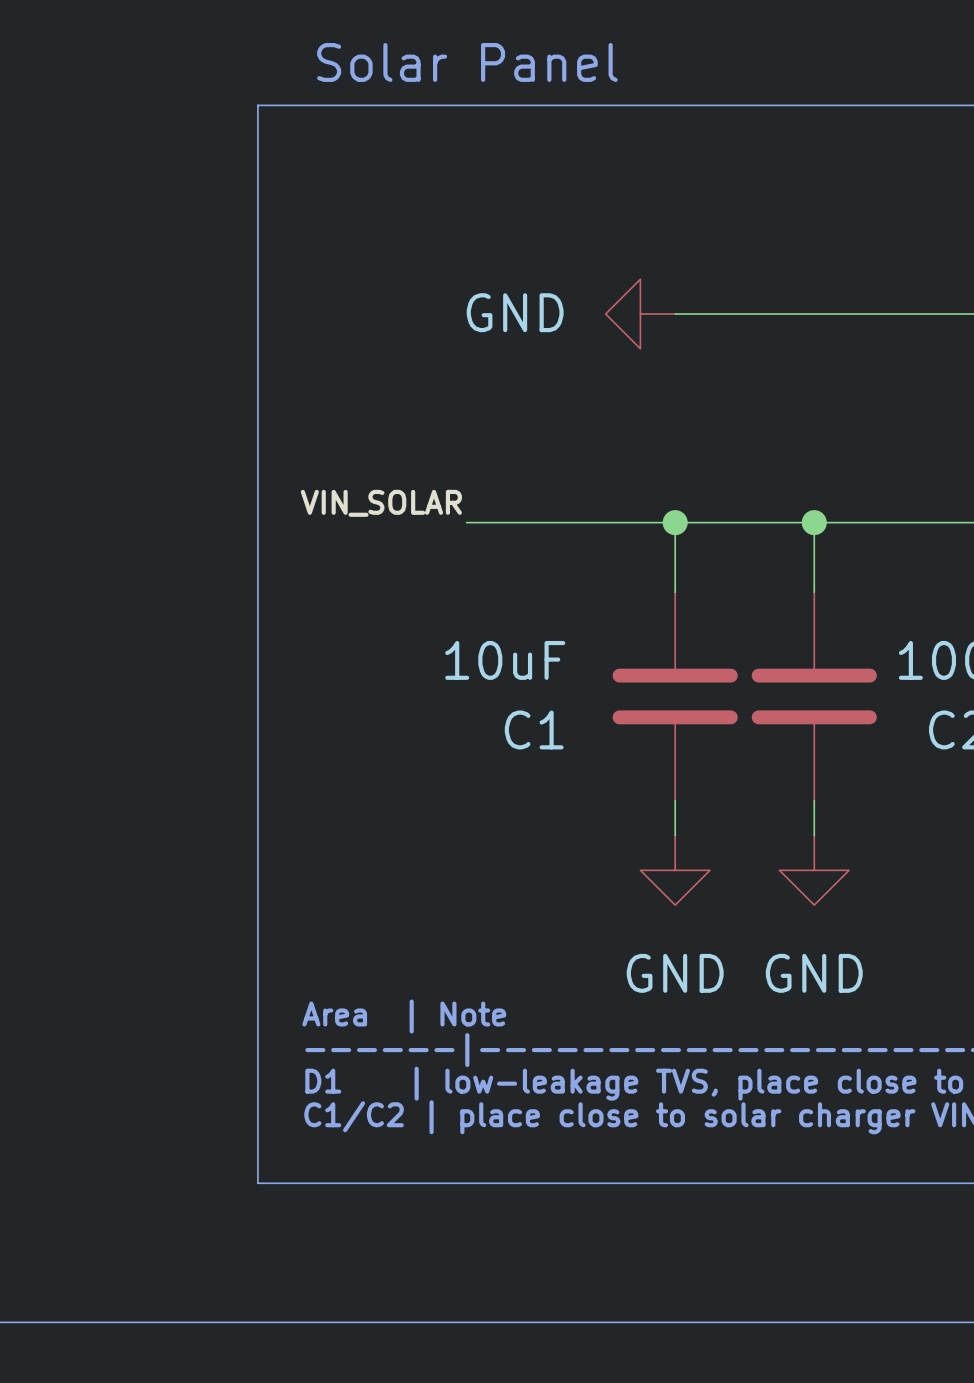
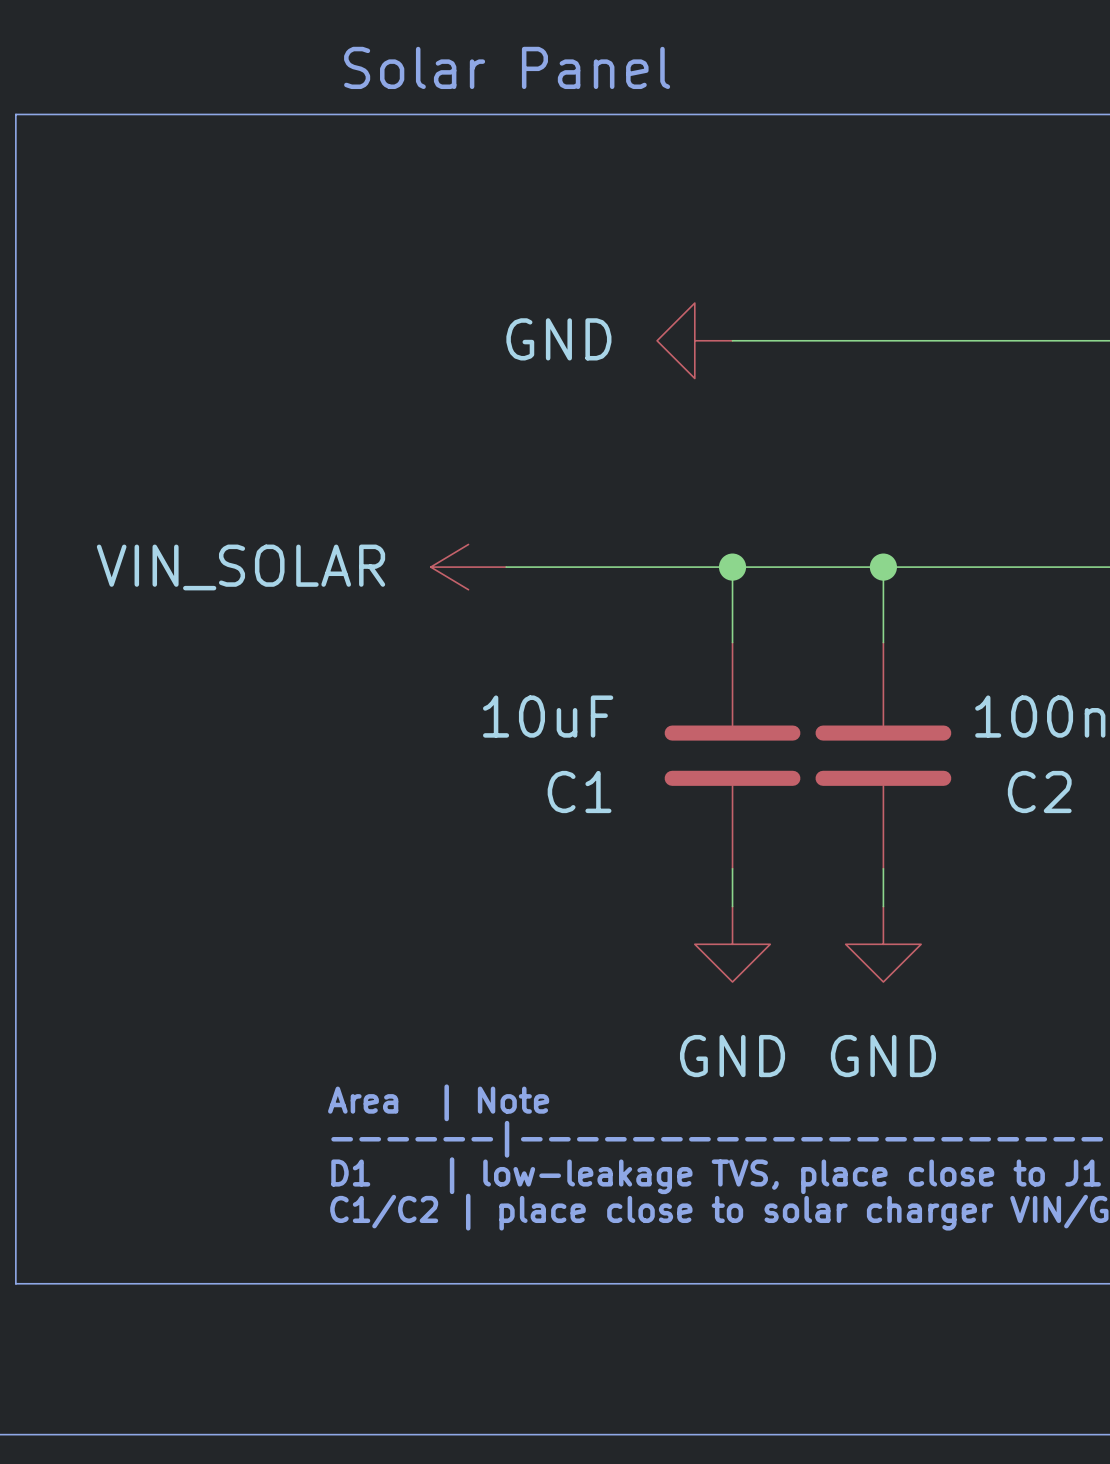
line: (257, 105) (257, 1183) -> (279, 114) (15, 114) (15, 1283) (279, 1283)
label: VIN_SOLAR (381, 503) -> none
power symbol: none -> VIN_SOLAR (468, 567)

